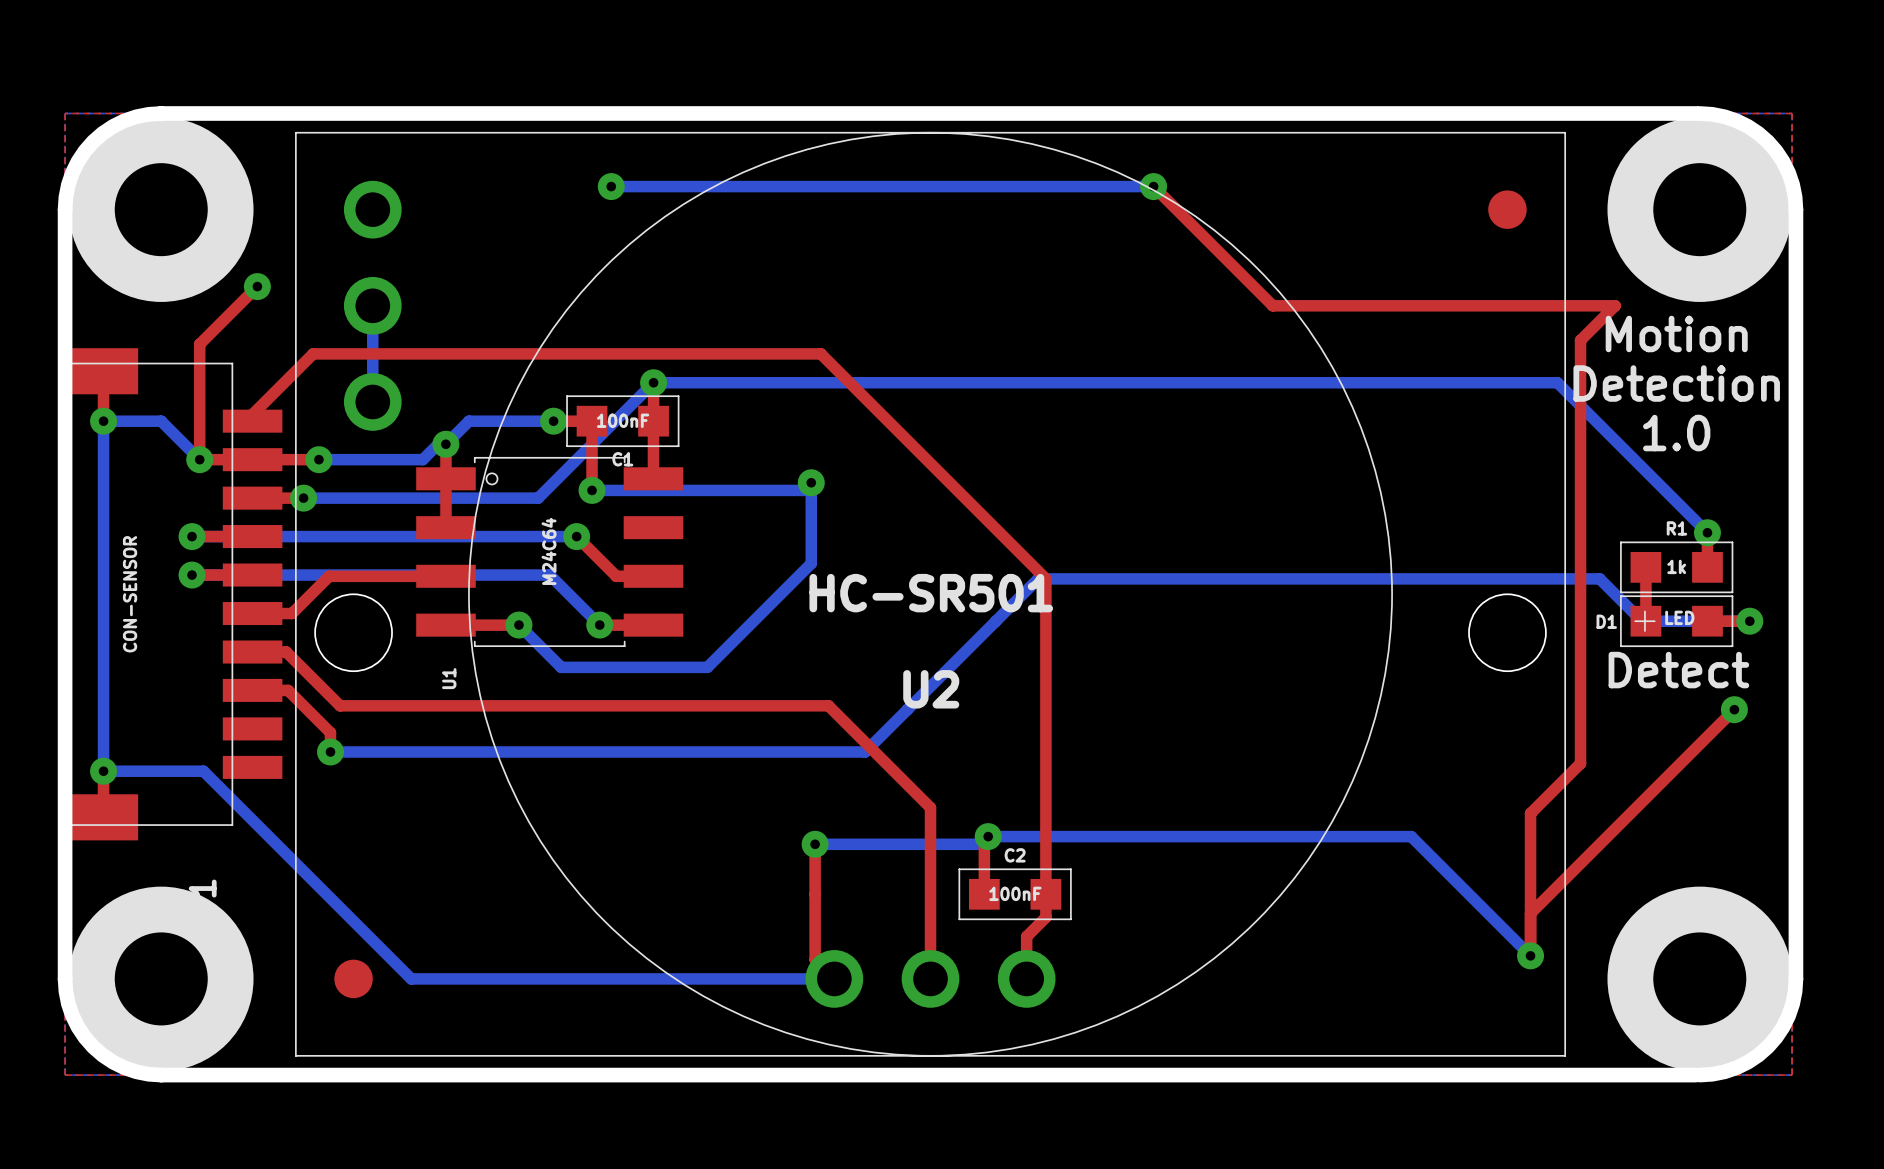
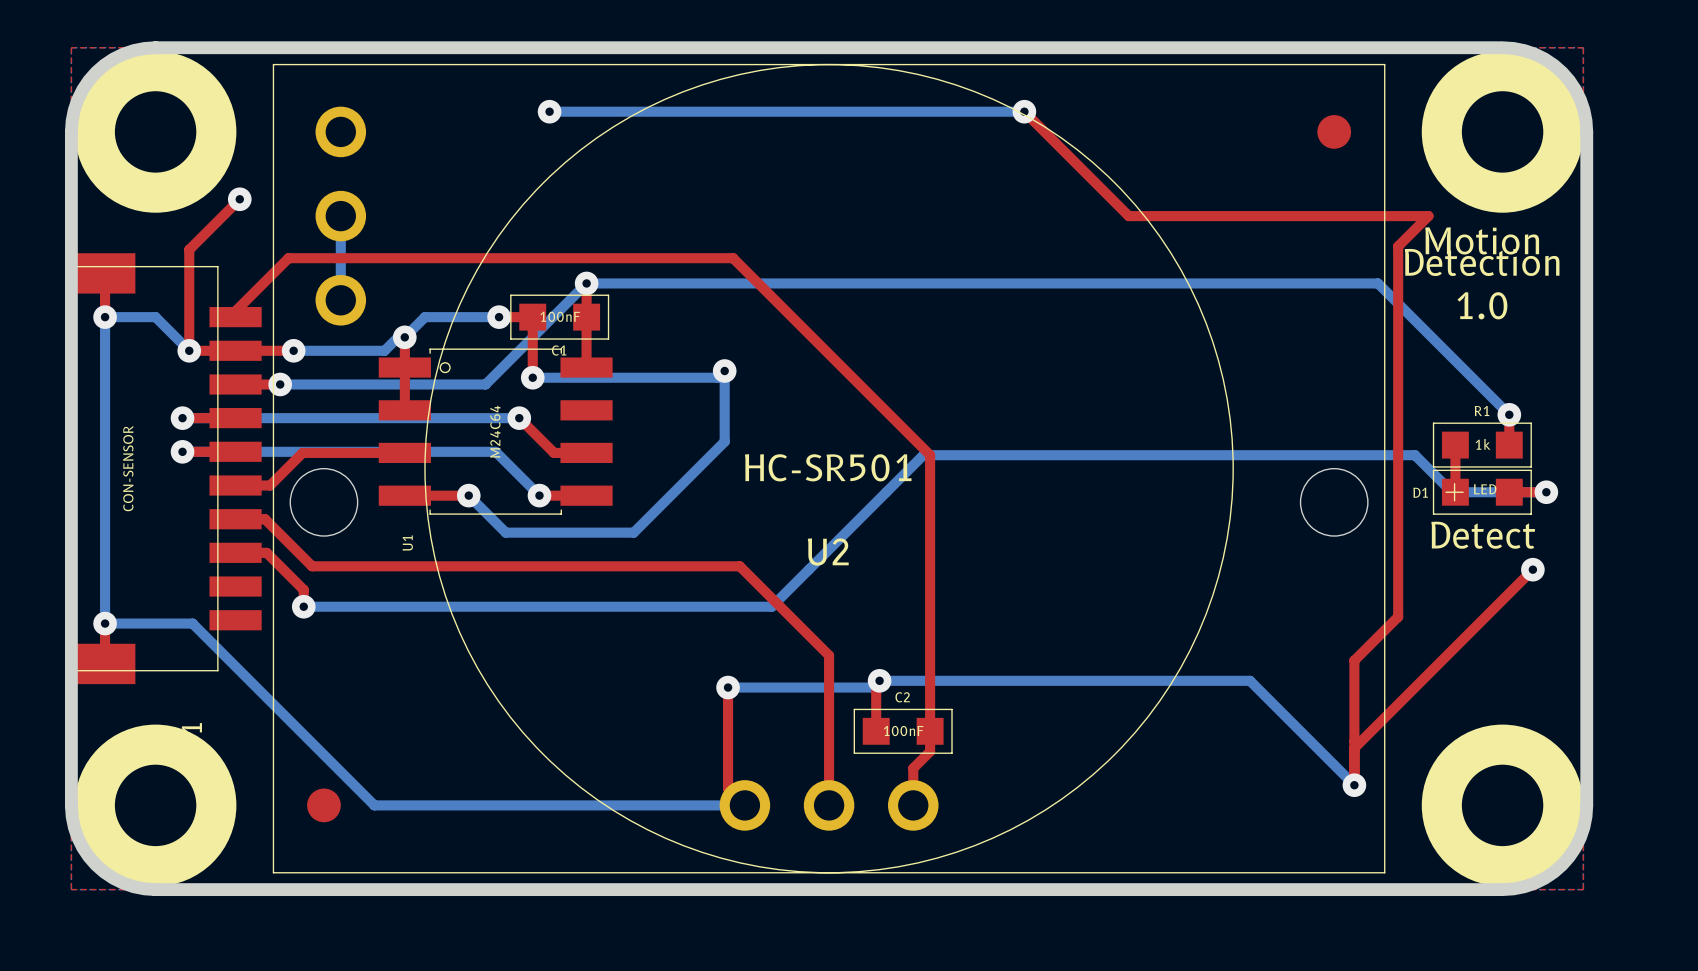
text position: Detection (1676, 383) -> Detection (1482, 262)
text position: 1.0 (1676, 433) -> 1.0 (1482, 305)

